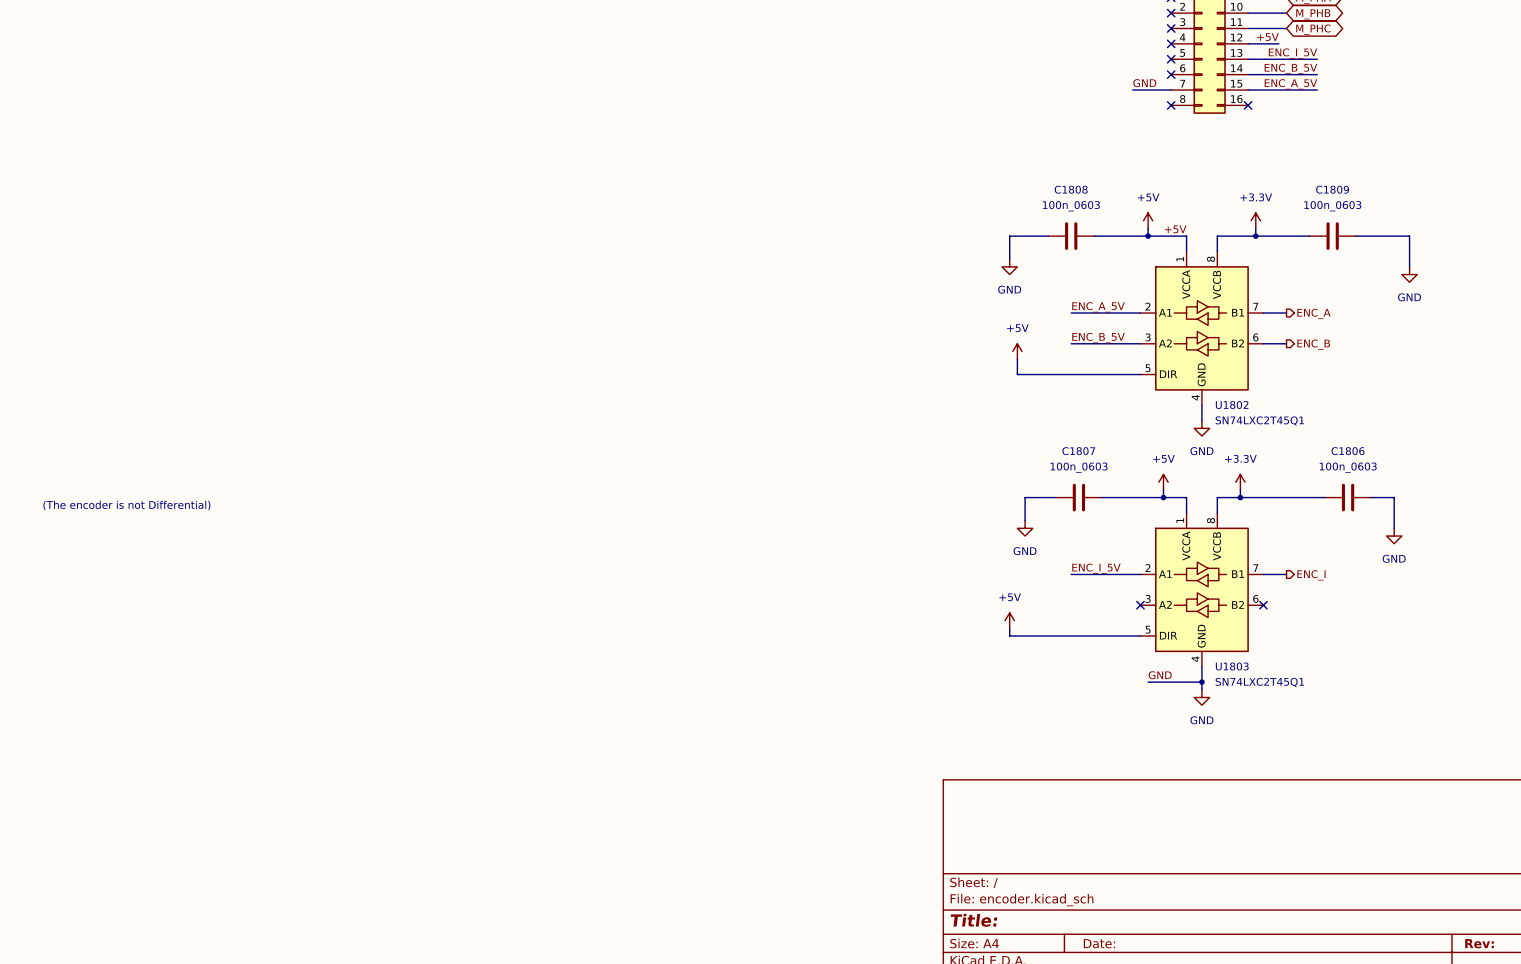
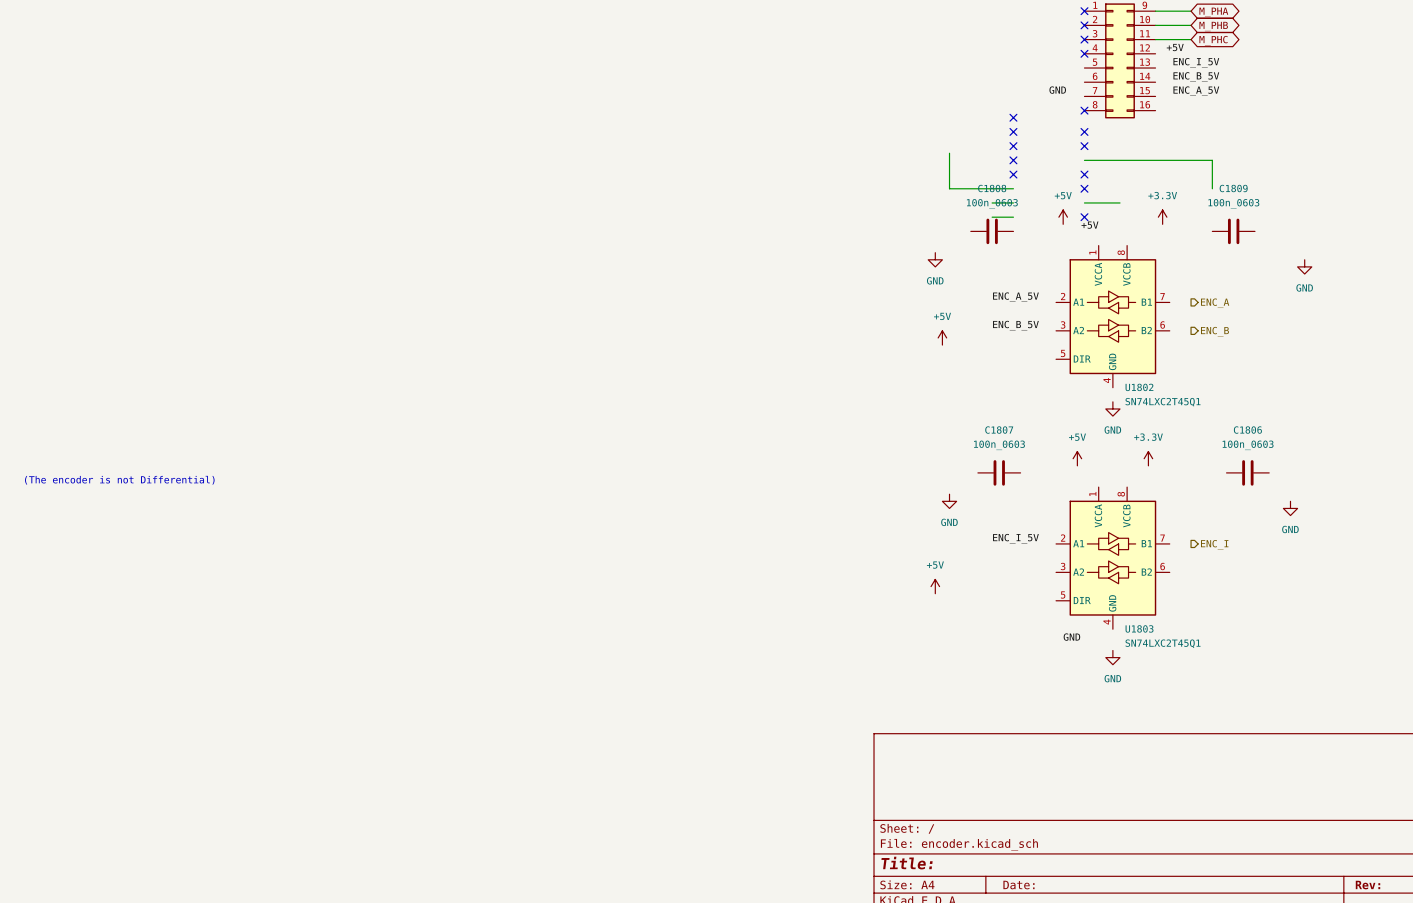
wire: (1248, 43) (1278, 43) -> none
no-connect mark: (1171, 59) -> none
wire: (1248, 59) (1317, 59) -> none
no-connect mark: (1171, 74) -> none
wire: (1248, 74) (1317, 74) -> none
wire: (1132, 90) (1171, 90) -> (1084, 202) (1120, 202)
wire: (1248, 90) (1317, 90) -> none
no-connect mark: (1248, 105) -> none
no-connect mark: none -> (1013, 117)
no-connect mark: none -> (1013, 131)
no-connect mark: none -> (1084, 131)
no-connect mark: none -> (1013, 146)
no-connect mark: none -> (1084, 146)
wire: none -> (949, 153) (949, 188) (1013, 188)
no-connect mark: none -> (1013, 160)
wire: none -> (1084, 160) (1212, 160) (1212, 188)
no-connect mark: none -> (1013, 174)
no-connect mark: none -> (1084, 174)
no-connect mark: none -> (1084, 188)
wire: none -> (992, 202) (1013, 202)
wire: none -> (992, 217) (1013, 217)
no-connect mark: none -> (1084, 217)
wire: (1148, 228) (1148, 236) -> none
wire: (1255, 228) (1255, 236) -> none
wire: (1048, 236) (1009, 236) (1009, 259) -> none
wire: (1094, 236) (1186, 236) (1186, 251) -> none
junction: (1148, 236) -> none
junction: (1255, 236) -> none
wire: (1309, 236) (1217, 236) (1217, 251) -> none
wire: (1355, 236) (1409, 236) (1409, 266) -> none
wire: (1071, 313) (1140, 313) -> none
wire: (1263, 313) (1286, 313) -> none
wire: (1071, 343) (1140, 343) -> none
wire: (1263, 343) (1286, 343) -> none
wire: (1017, 359) (1017, 374) (1140, 374) -> none
wire: (1201, 405) (1201, 420) -> none
wire: (1163, 489) (1163, 497) -> none
wire: (1240, 489) (1240, 497) -> none
wire: (1055, 497) (1025, 497) (1025, 520) -> none
wire: (1101, 497) (1186, 497) (1186, 512) -> none
junction: (1163, 497) -> none
junction: (1240, 497) -> none
wire: (1324, 497) (1217, 497) (1217, 512) -> none
wire: (1371, 497) (1394, 497) (1394, 528) -> none
wire: (1071, 574) (1140, 574) -> none
wire: (1263, 574) (1286, 574) -> none
no-connect mark: (1140, 605) -> none
no-connect mark: (1263, 605) -> none
wire: (1009, 628) (1009, 635) (1140, 635) -> none
wire: (1201, 666) (1201, 689) -> none
wire: (1148, 682) (1201, 682) -> none
junction: (1201, 682) -> none

